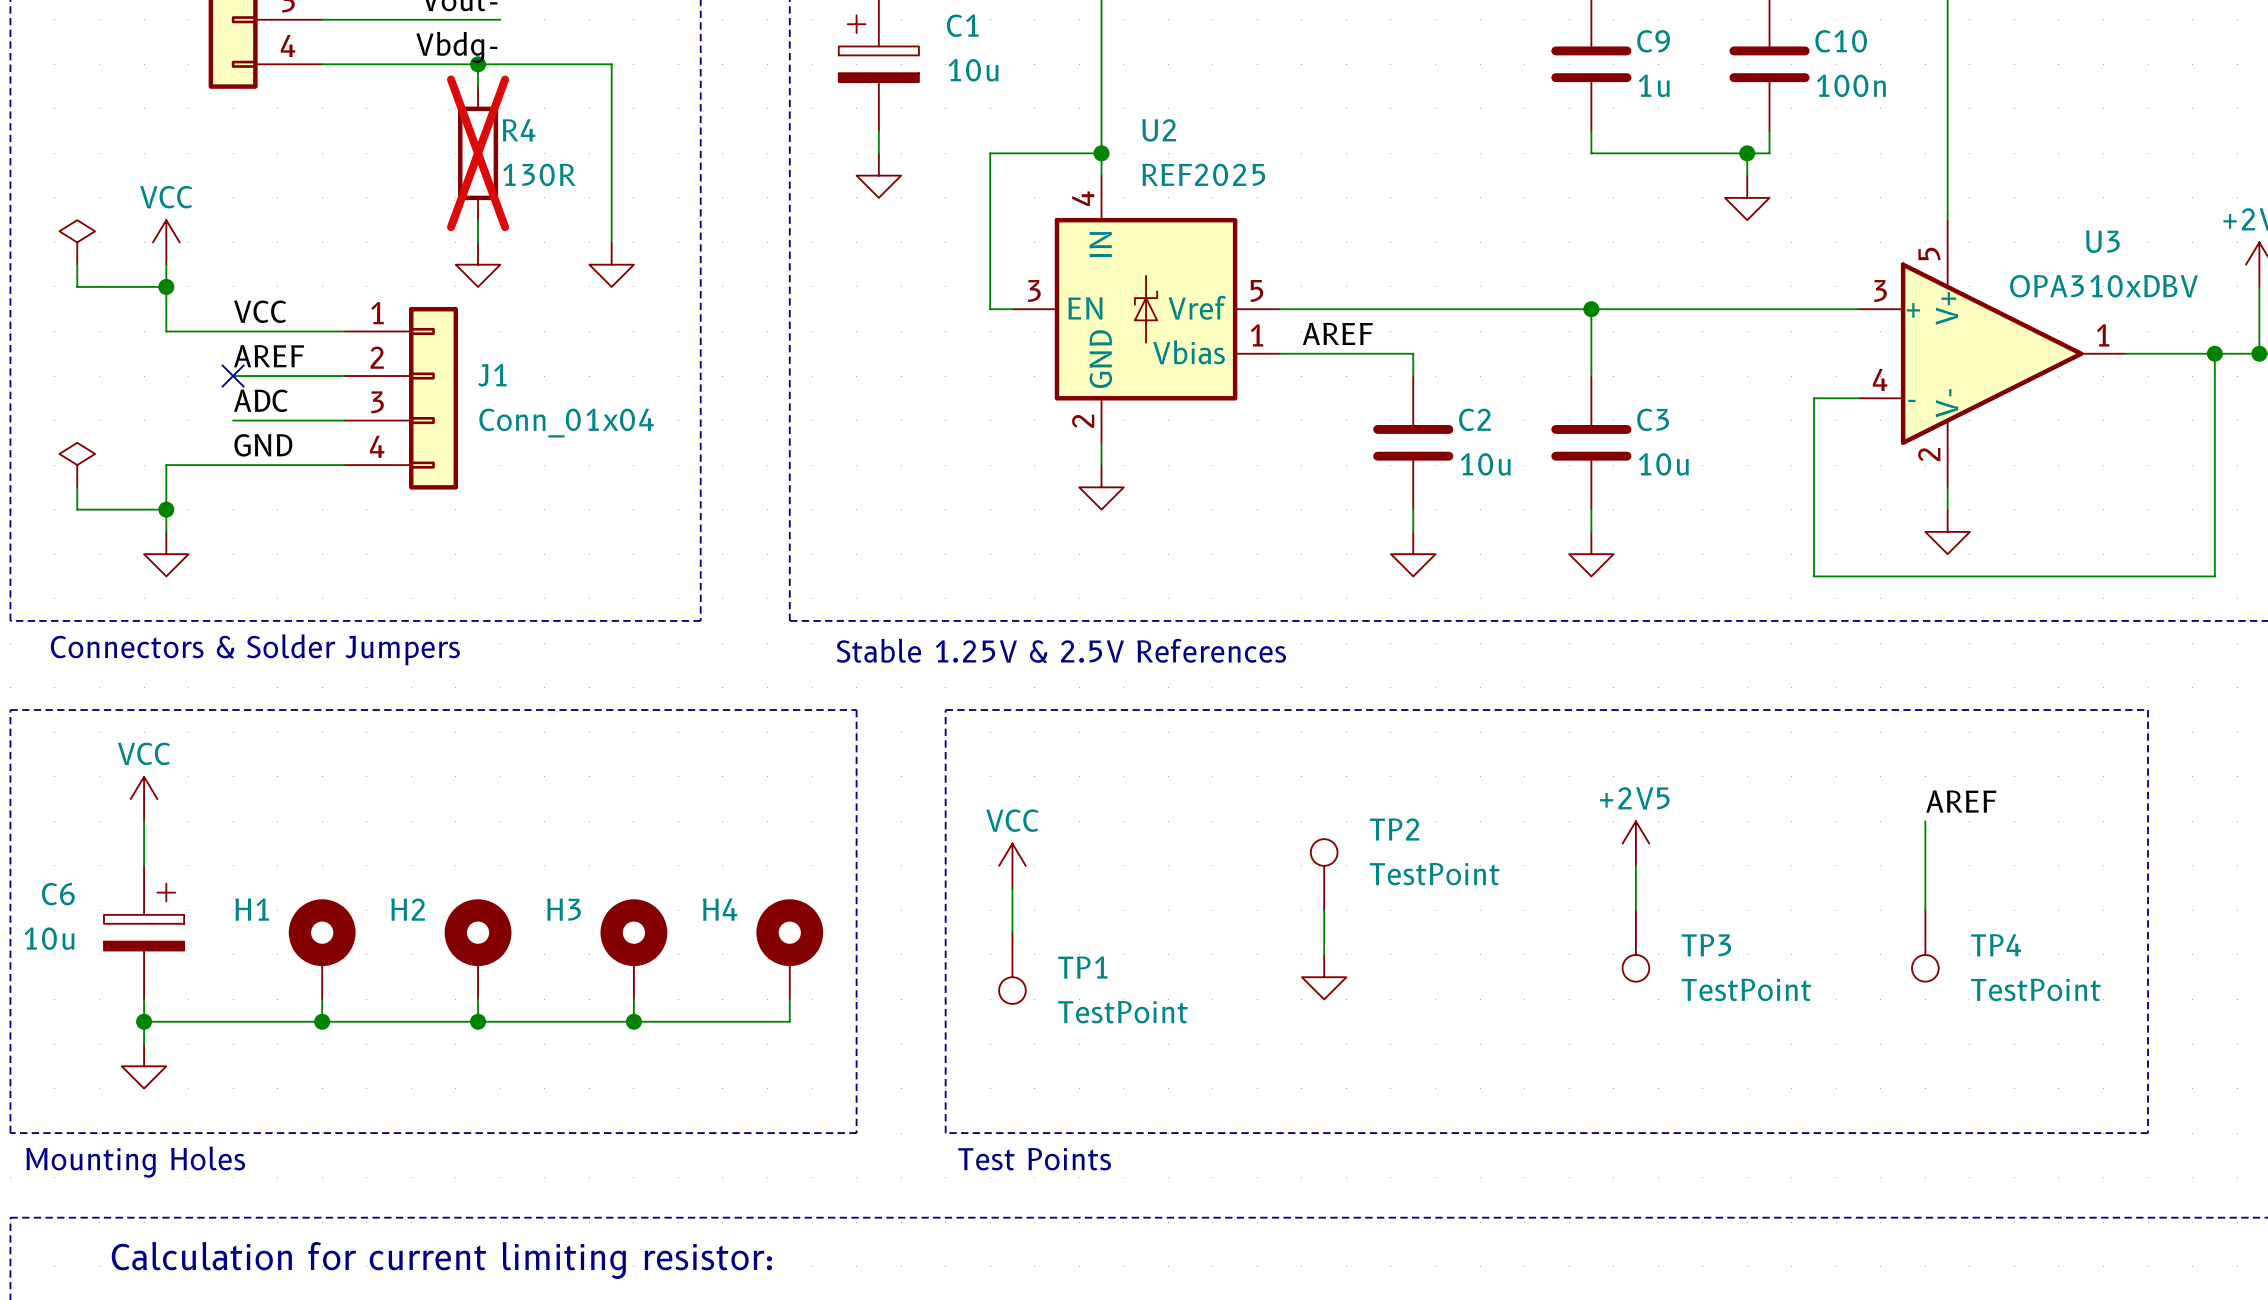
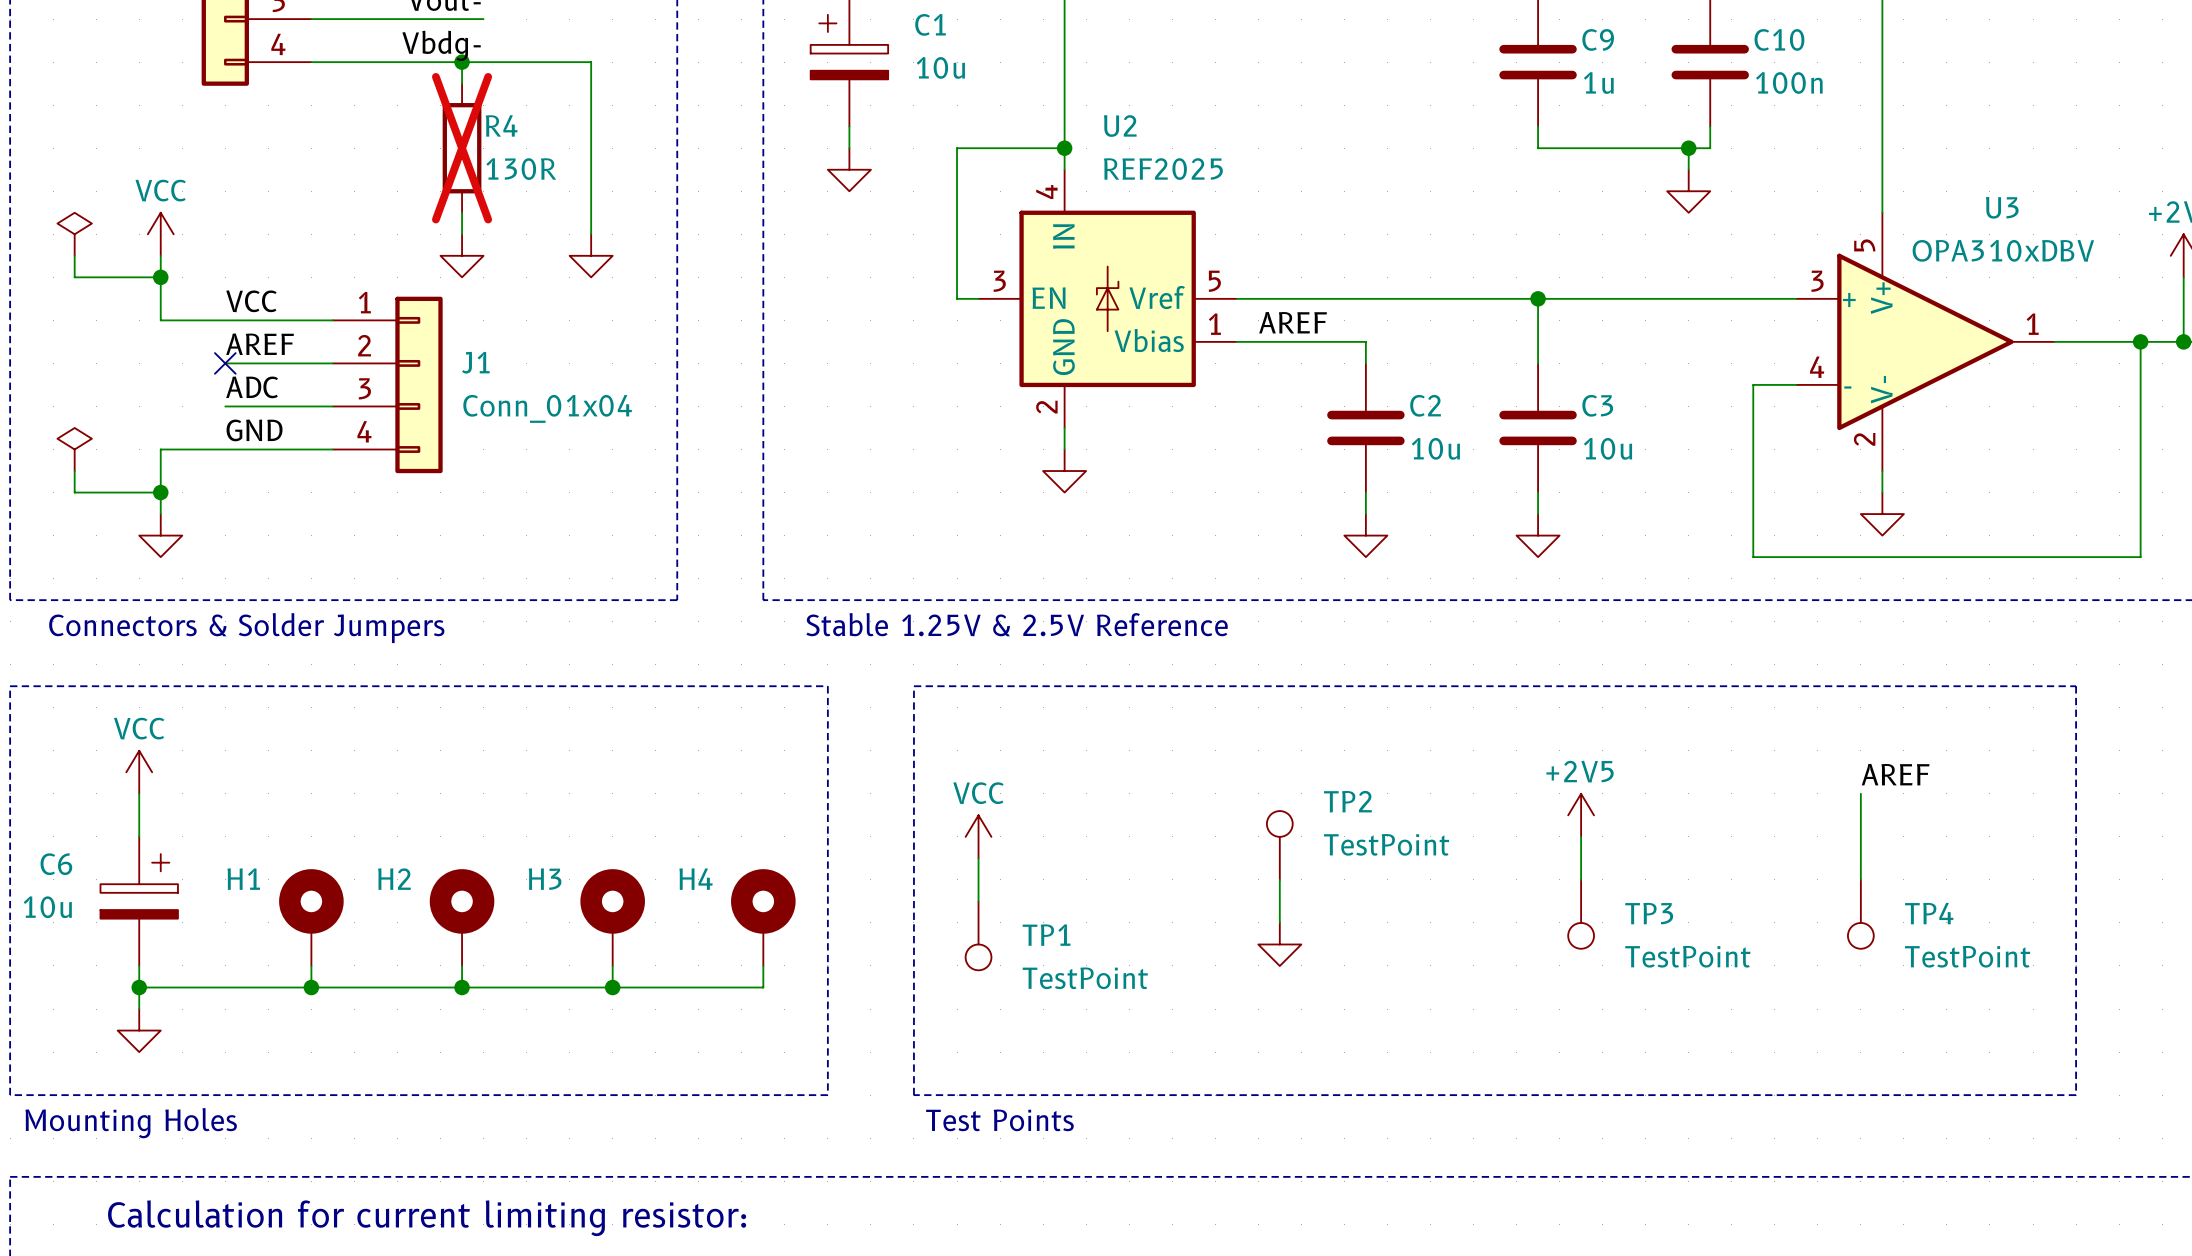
U3 name position: U3 (2102, 241) -> U3 (2002, 207)
U3 value position: OPA310xDBV (2103, 286) -> OPA310xDBV (2003, 250)
text: Stable 1.25V & 2.5V References (1061, 650) -> Stable 1.25V & 2.5V Reference (1017, 624)

